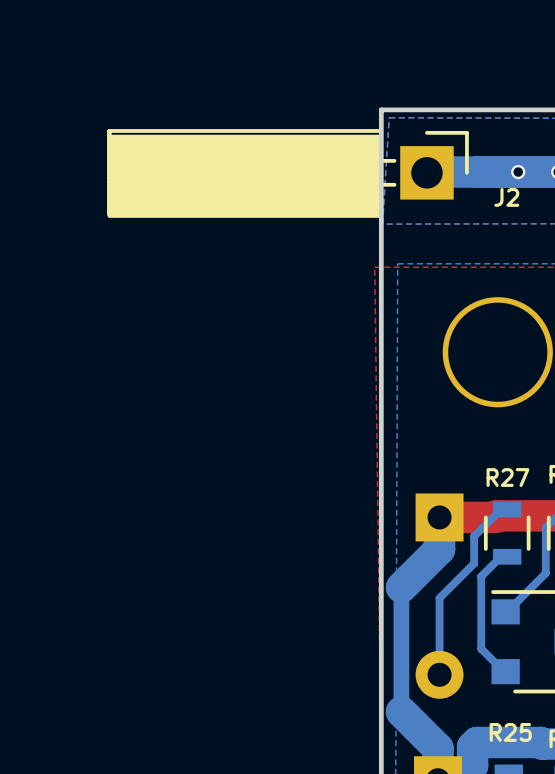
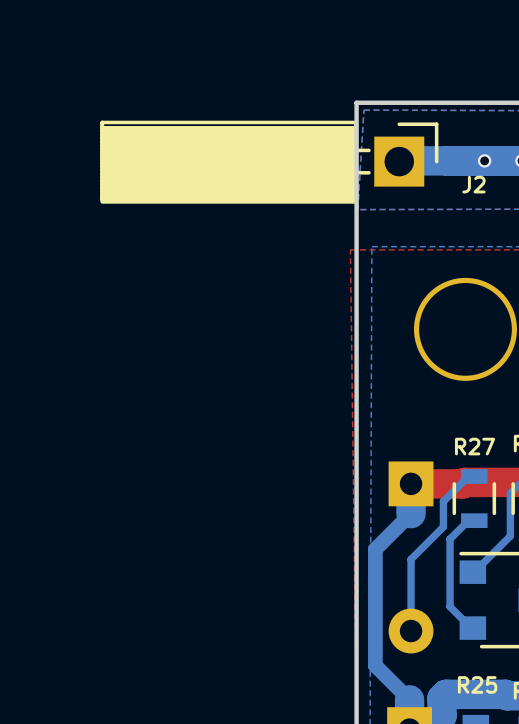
bottom track width: thick (439, 549) (401, 587) -> thin (411, 513) (375, 549)
bottom track width: thick (401, 711) (437, 748) -> thin (375, 665) (409, 699)

